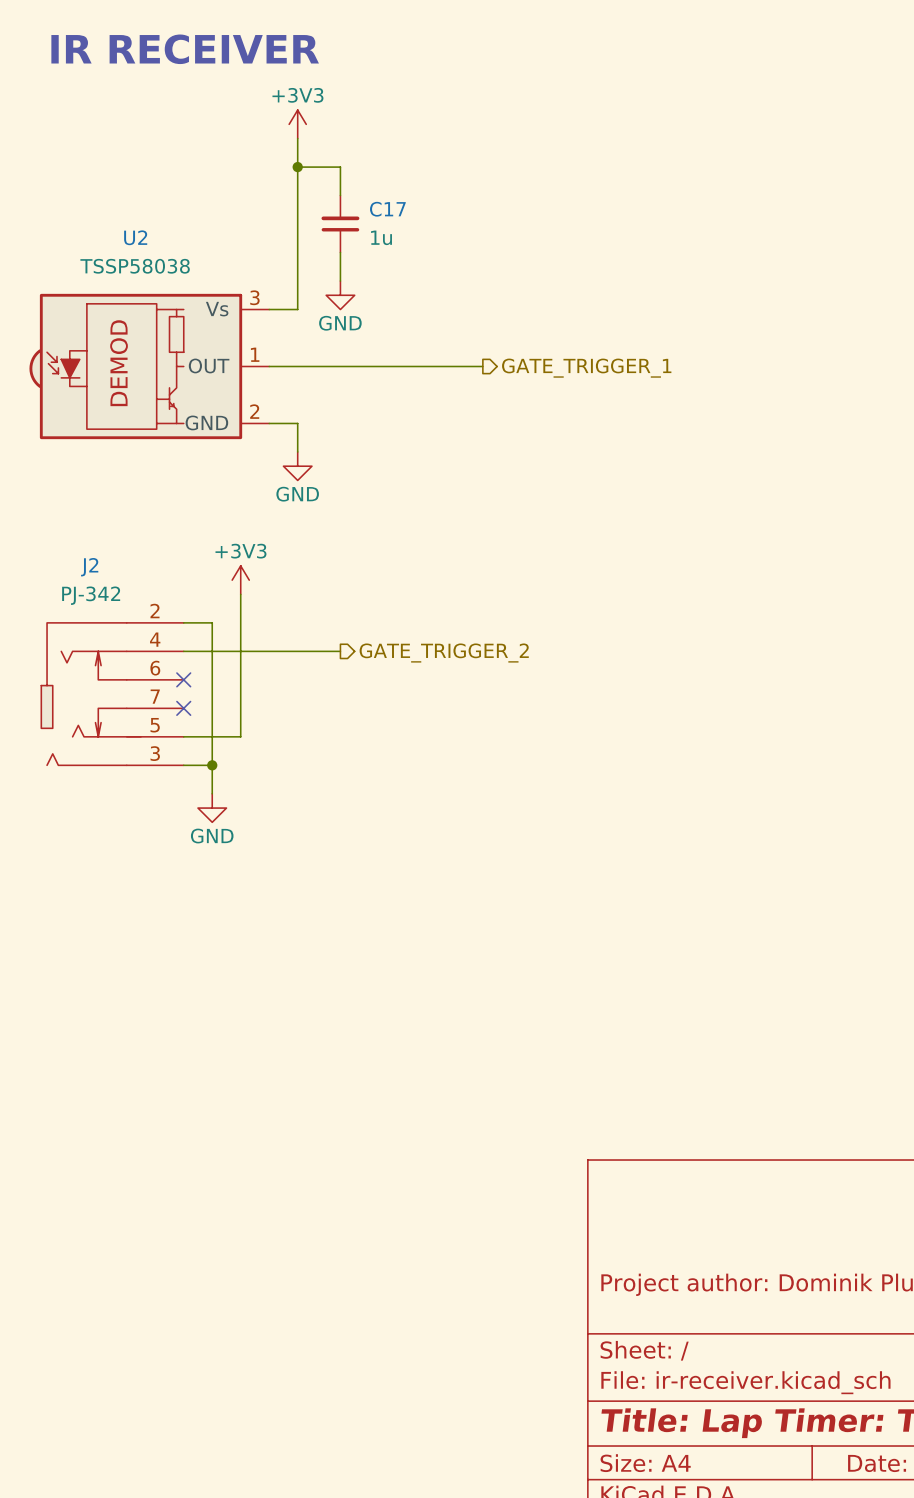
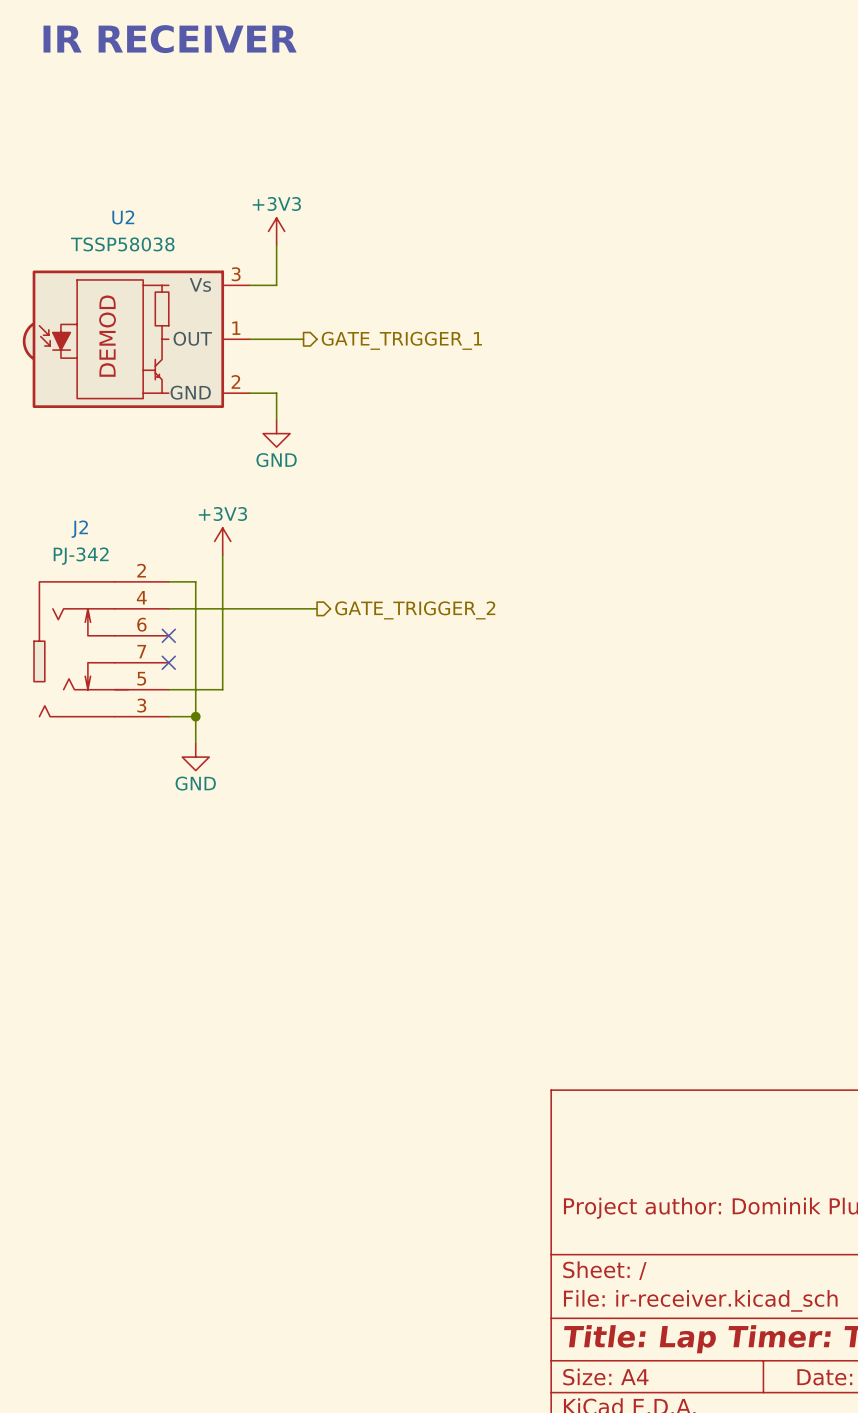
power symbol position: +3V3 (297, 124) -> +3V3 (276, 231)
wire: (297, 138) (297, 266) -> none
wire: (297, 167) (340, 167) (340, 195) -> none
junction: (297, 167) -> none
C17: (340, 224) -> none
wire: (340, 252) (340, 281) -> none
power symbol: GND (340, 295) -> none
wire: (326, 366) (482, 366) -> none
hierarchical label position: GATE_TRIGGER_1 (586, 368) -> GATE_TRIGGER_1 (401, 340)

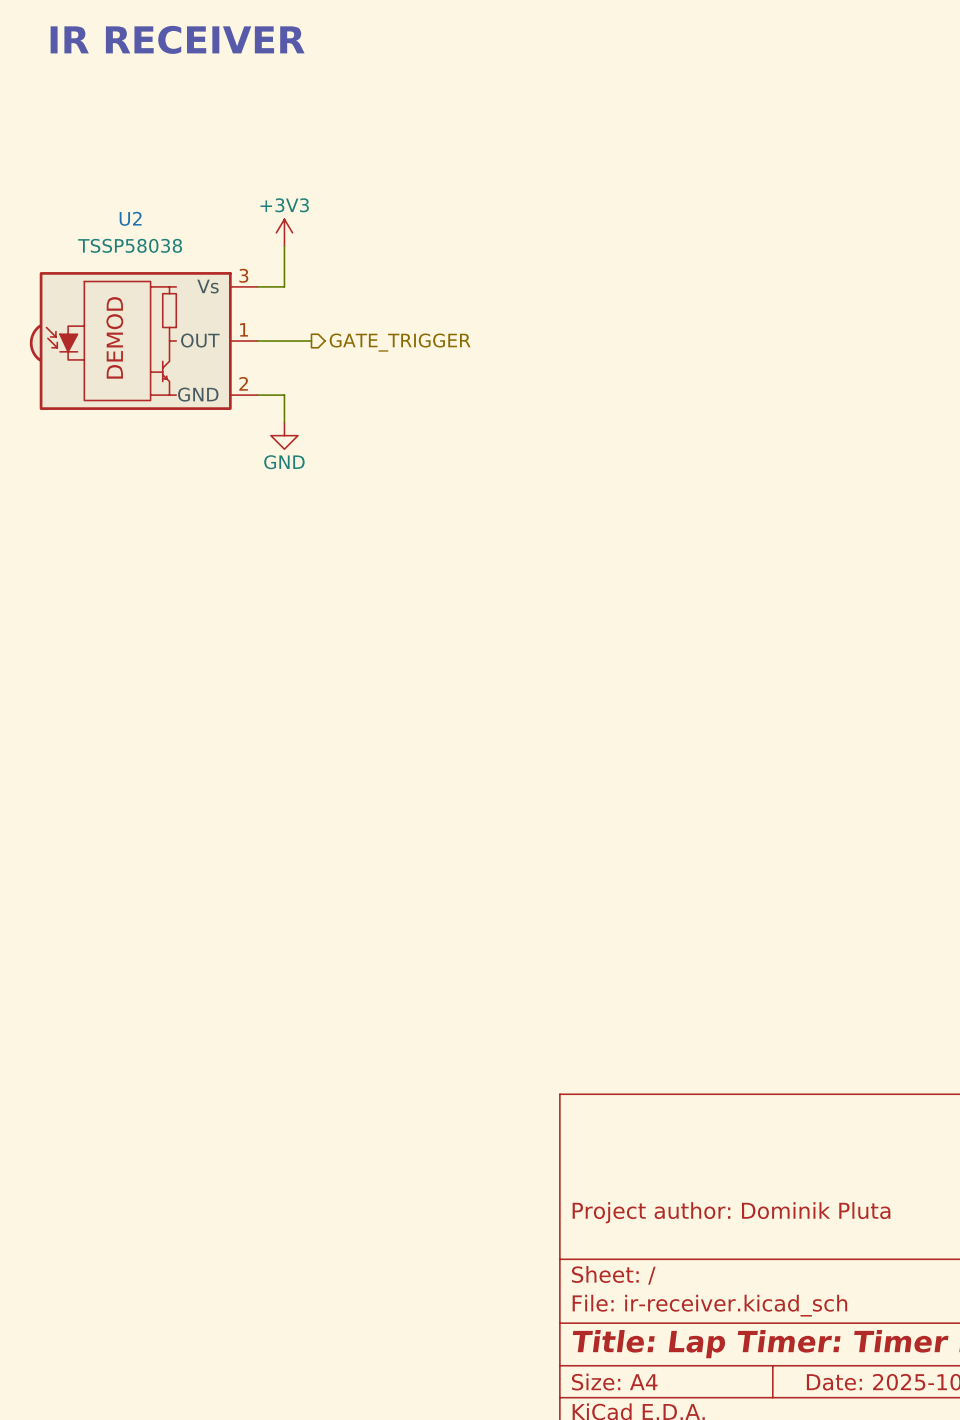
hierarchical label: GATE_TRIGGER_1 (401, 340) -> GATE_TRIGGER (400, 342)
power symbol: +3V3 (222, 541) -> none
wire: (222, 554) (222, 689) (168, 689) -> none
wire: (168, 581) (195, 581) (195, 743) -> none
wire: (168, 608) (317, 608) -> none
hierarchical label: GATE_TRIGGER_2 (415, 610) -> none
no-connect mark: (168, 635) -> none
J2: (101, 649) -> none
no-connect mark: (168, 662) -> none
wire: (168, 716) (195, 716) -> none
junction: (195, 716) -> none
power symbol: GND (195, 757) -> none

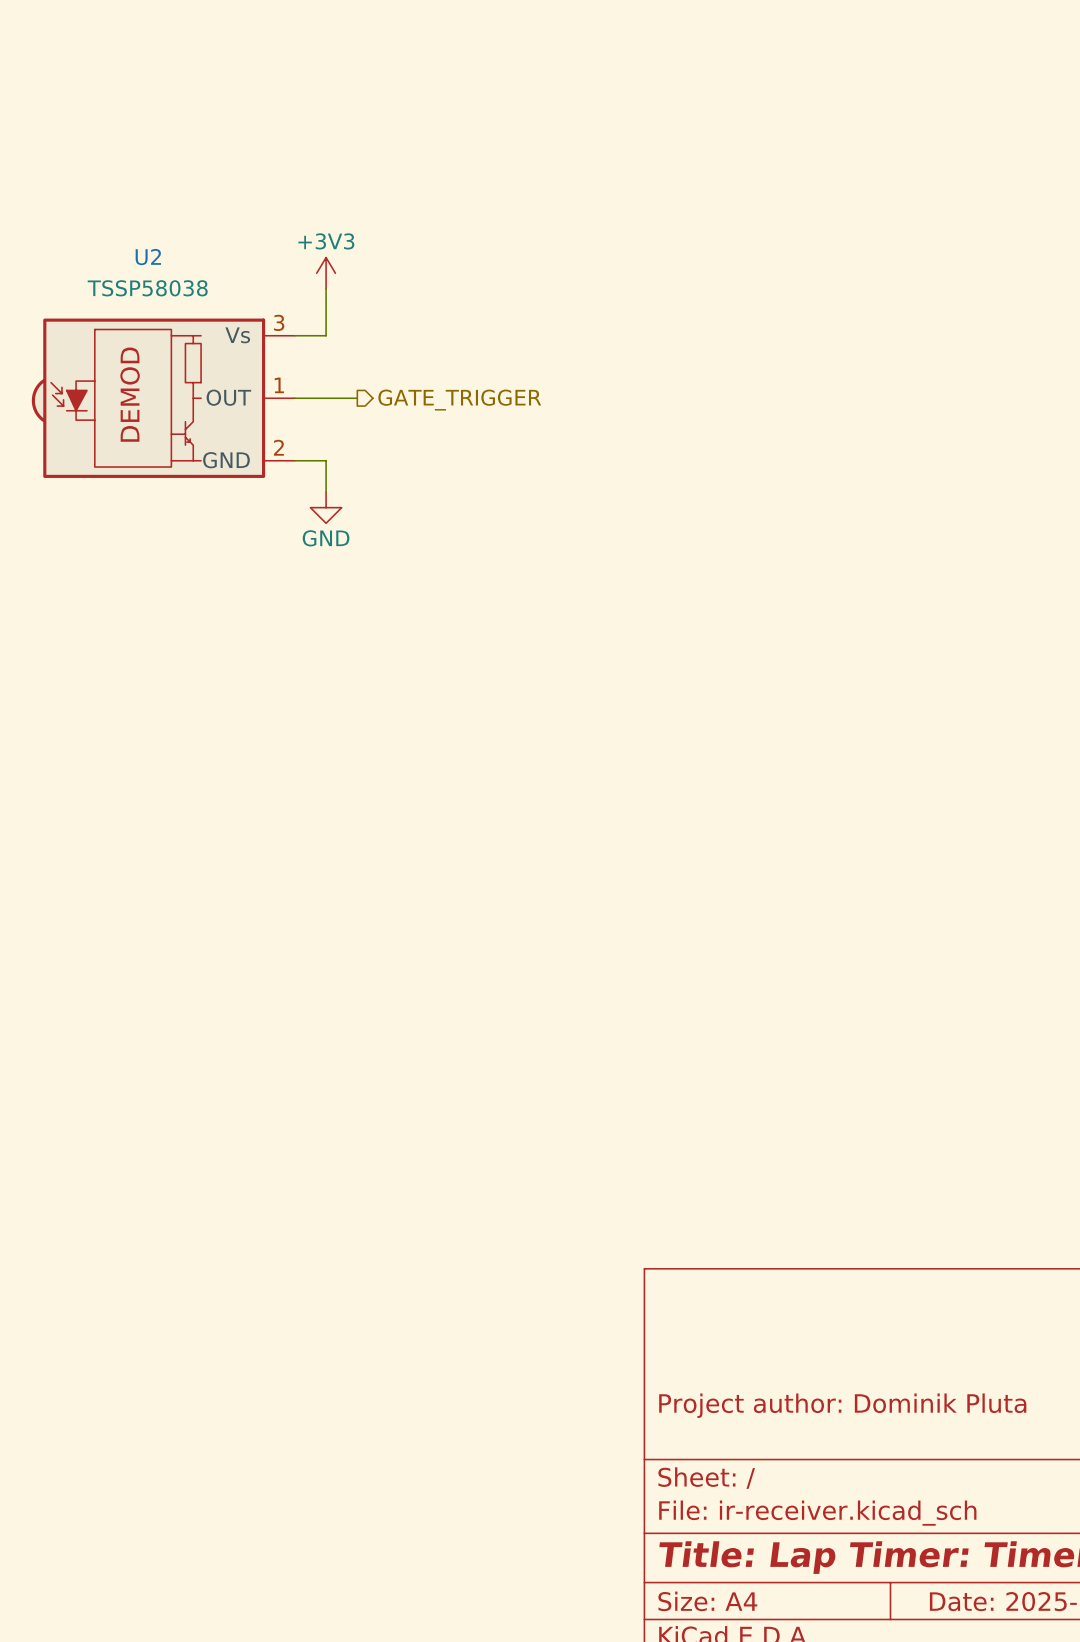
text: IR RECEIVER (177, 39) -> none

